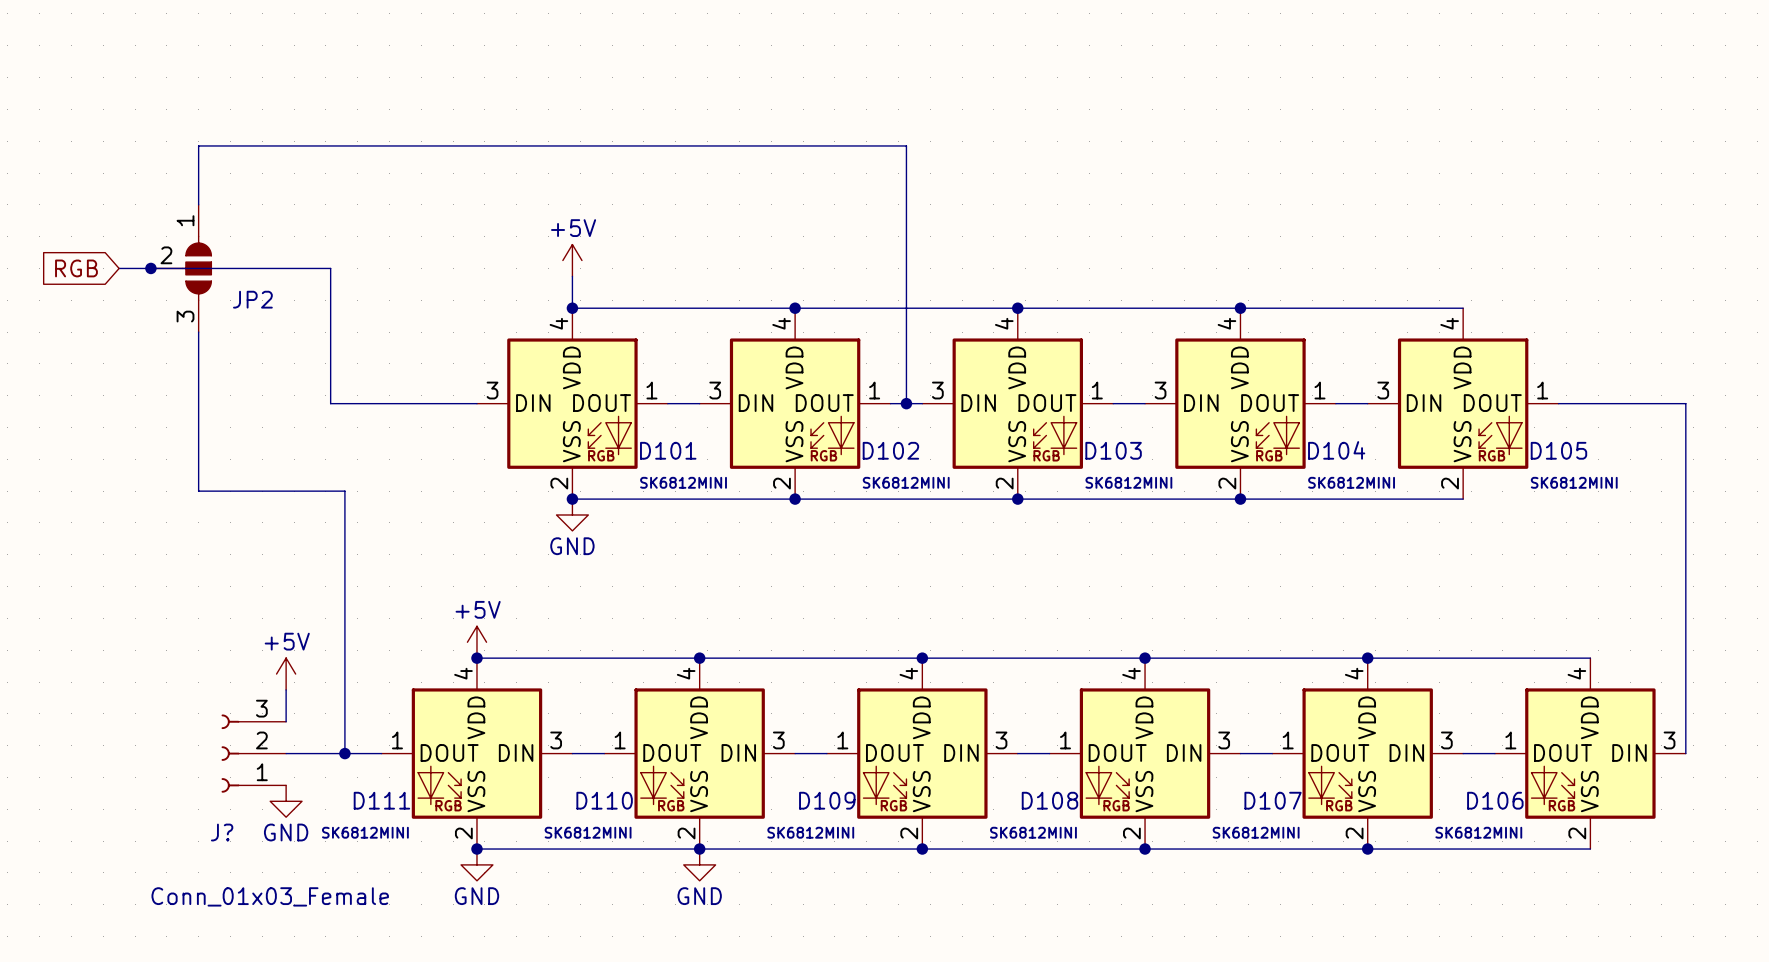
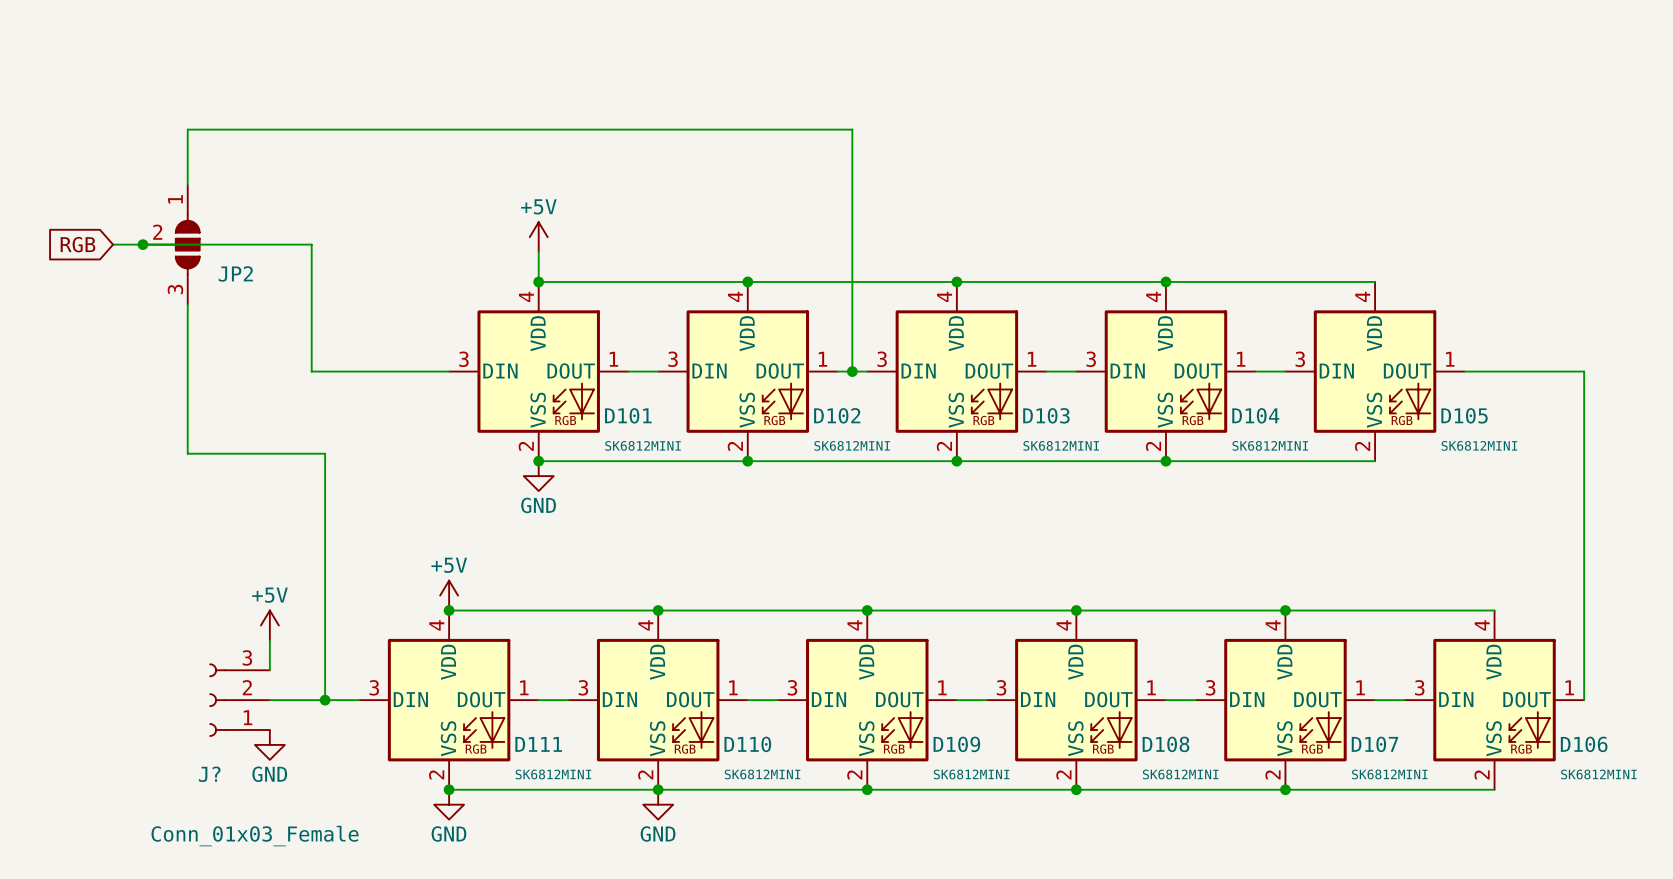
D111 flip: as is (476, 753) -> left-right (449, 700)
D110 flip: as is (699, 753) -> left-right (658, 700)
D109 flip: as is (922, 753) -> left-right (867, 700)
D108 flip: as is (1145, 753) -> left-right (1076, 700)
D107 flip: as is (1367, 753) -> left-right (1285, 700)
D106 flip: as is (1590, 753) -> left-right (1494, 700)

